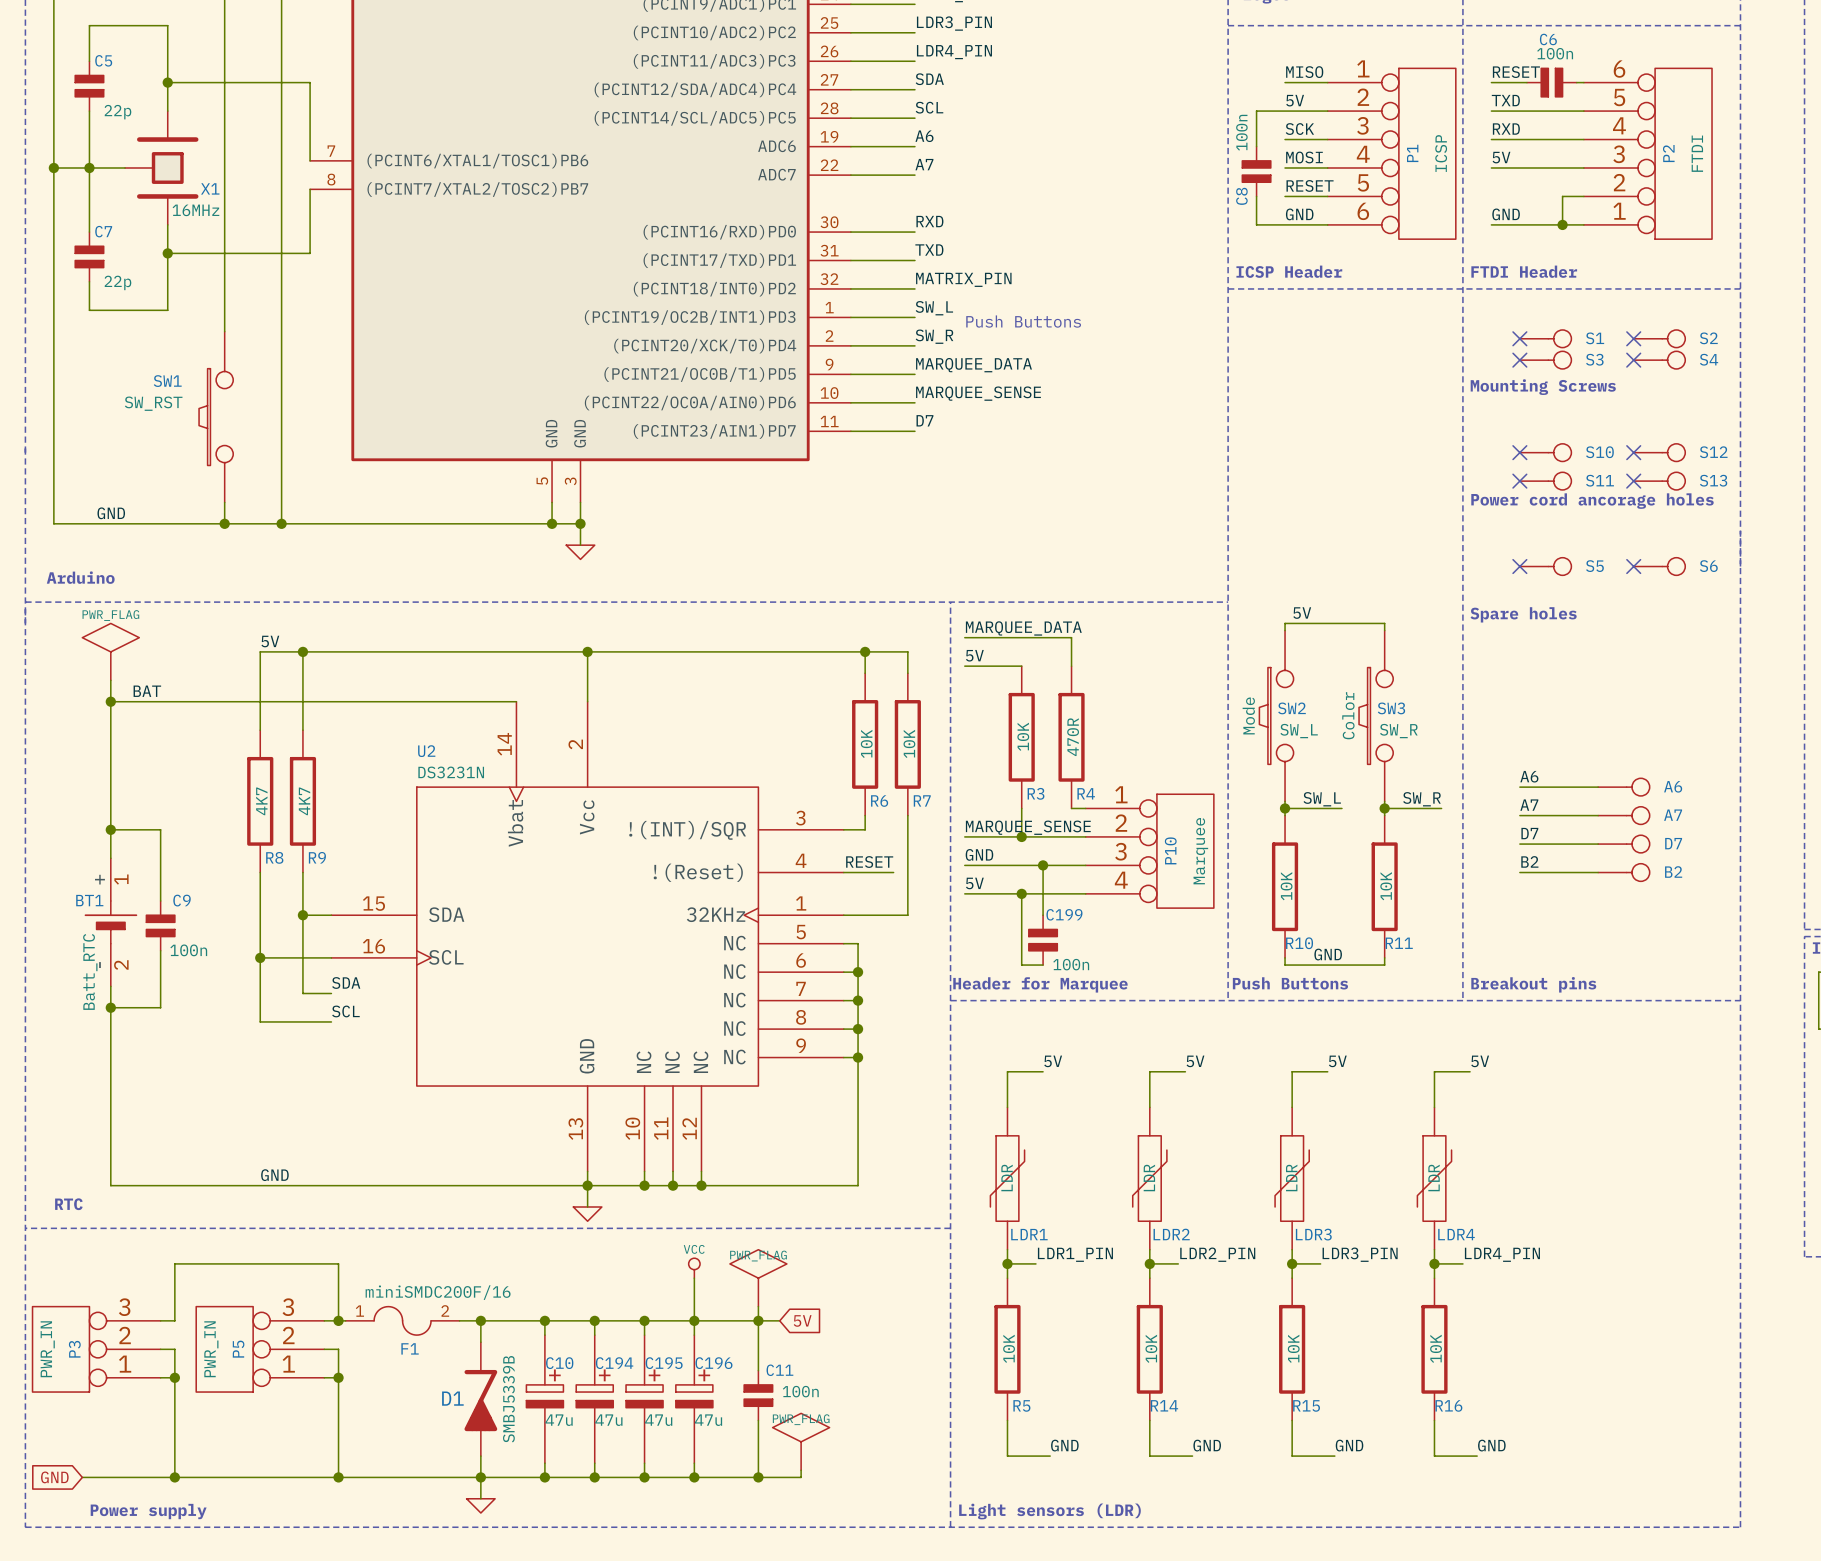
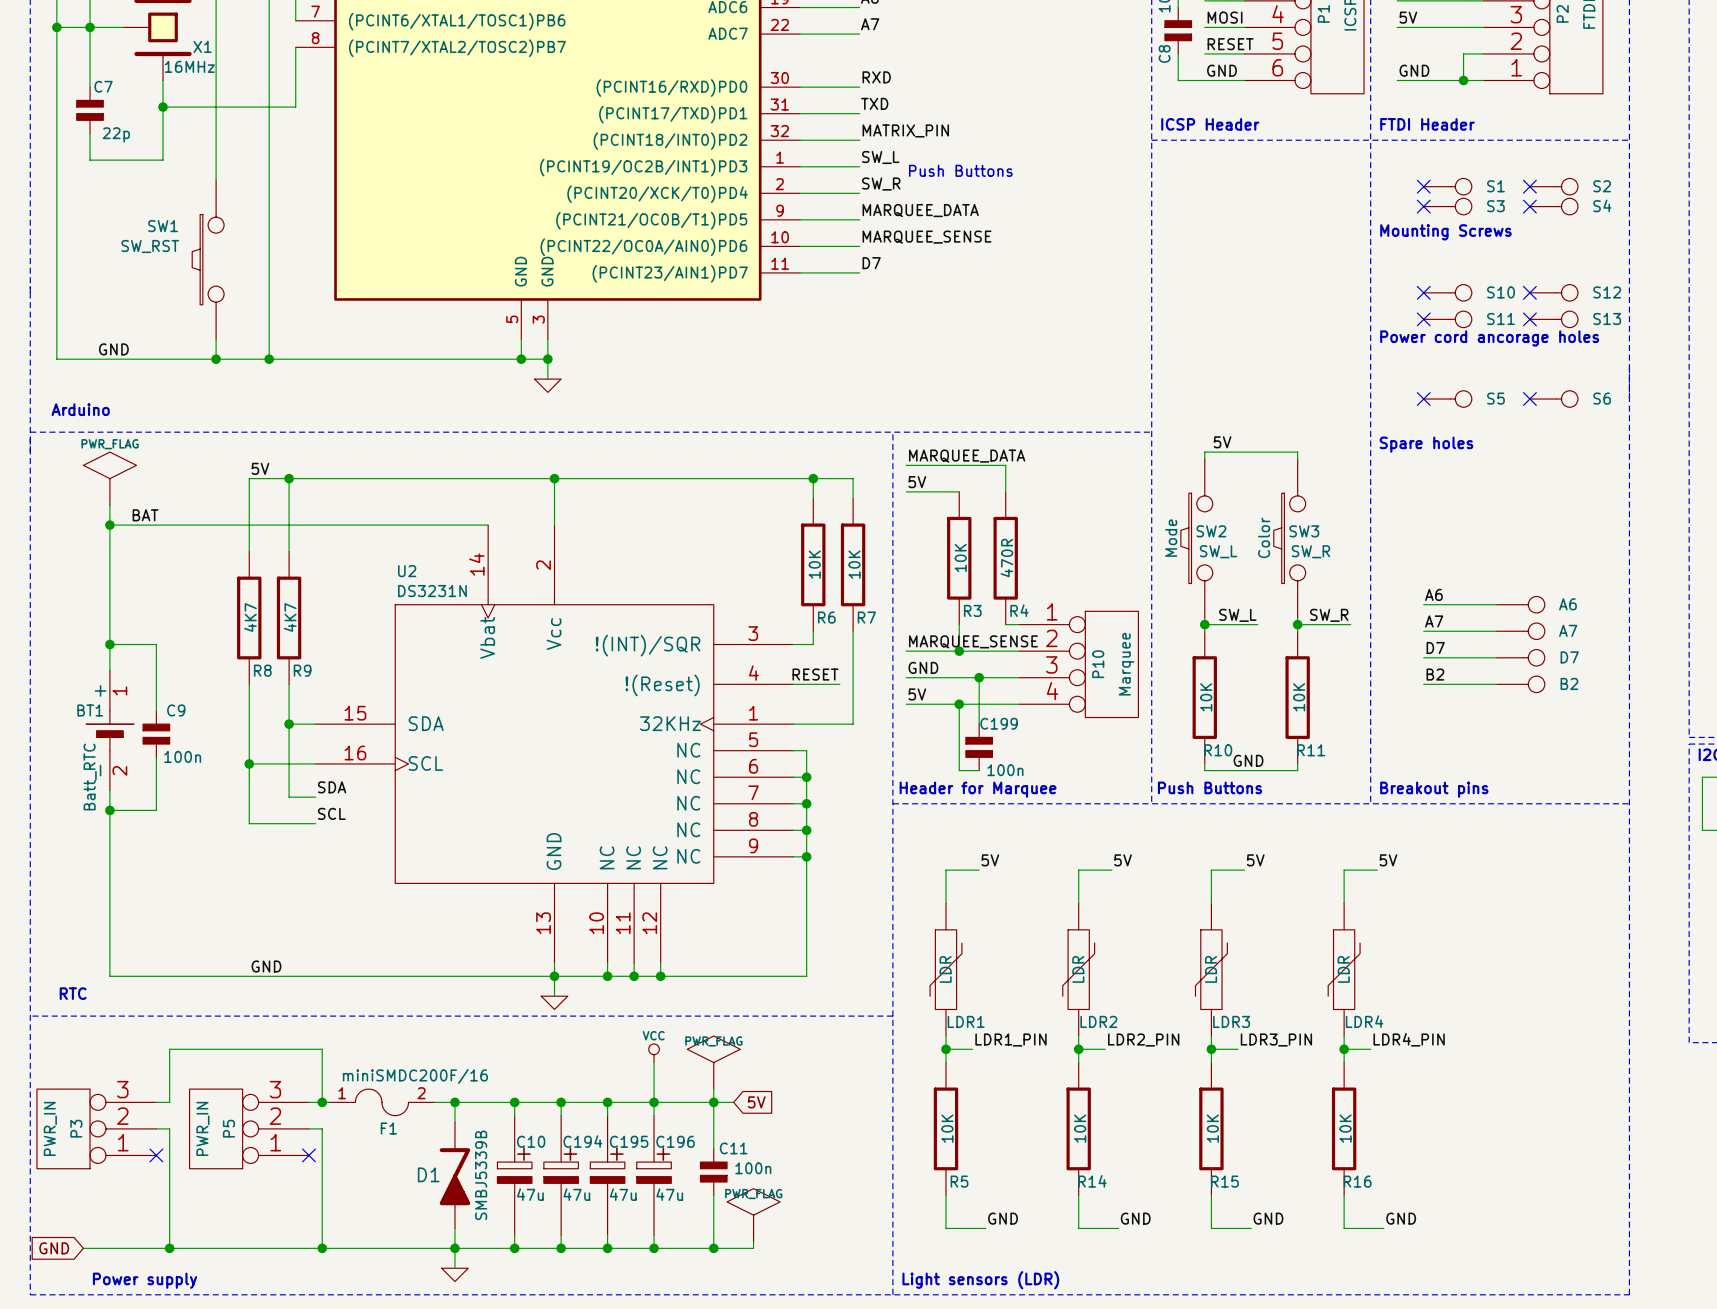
wire: (160, 1377) (174, 1377) -> none
no-connect mark: none -> (156, 1155)
junction: (174, 1377) -> none
wire: (324, 1377) (338, 1377) -> none
no-connect mark: none -> (308, 1155)
junction: (338, 1377) -> none

